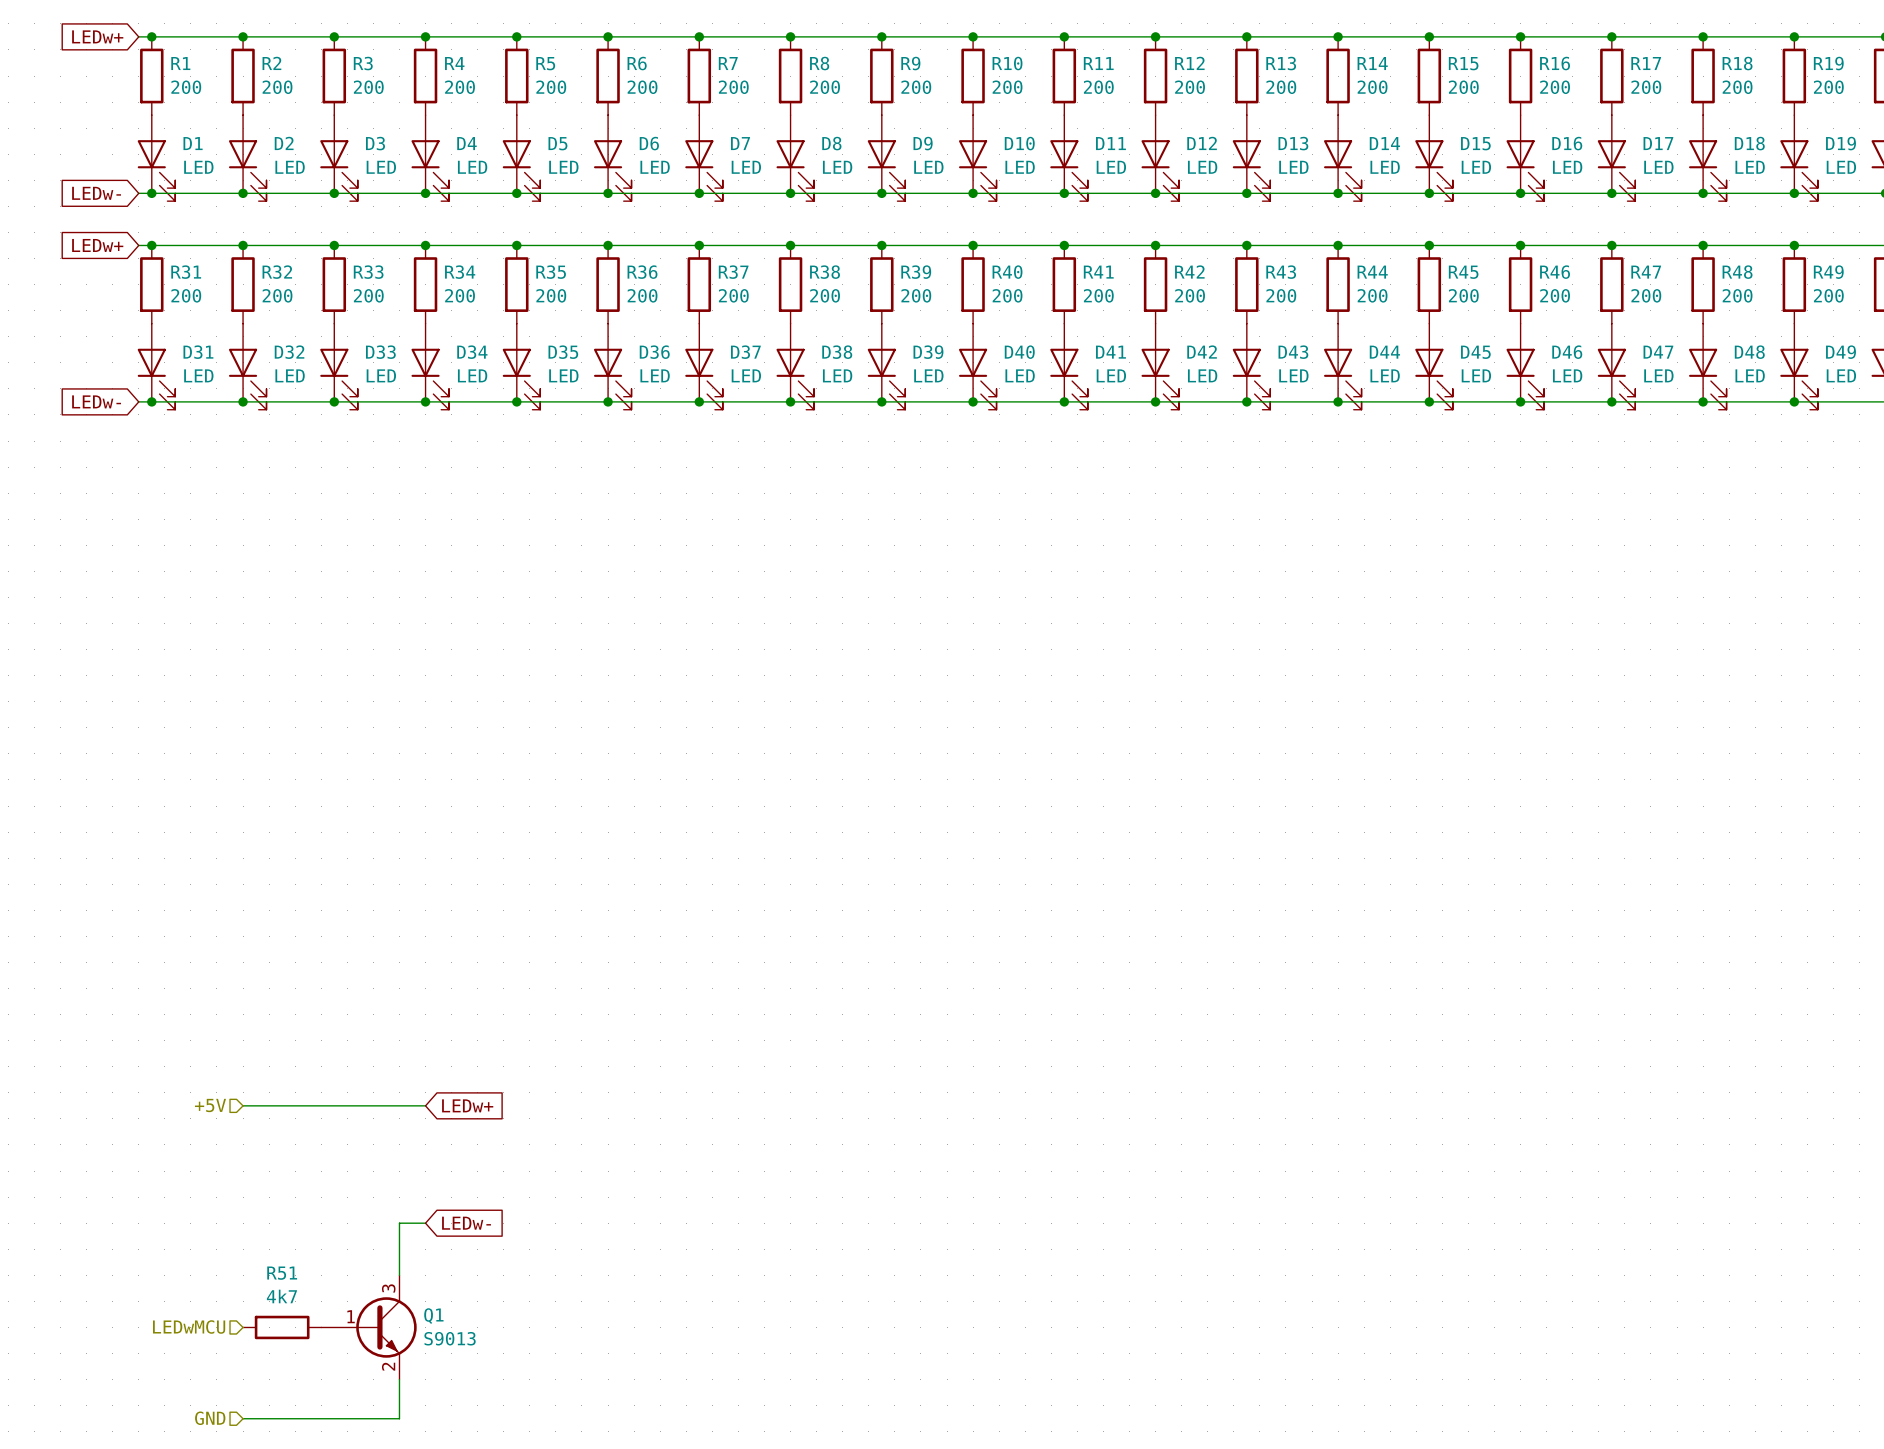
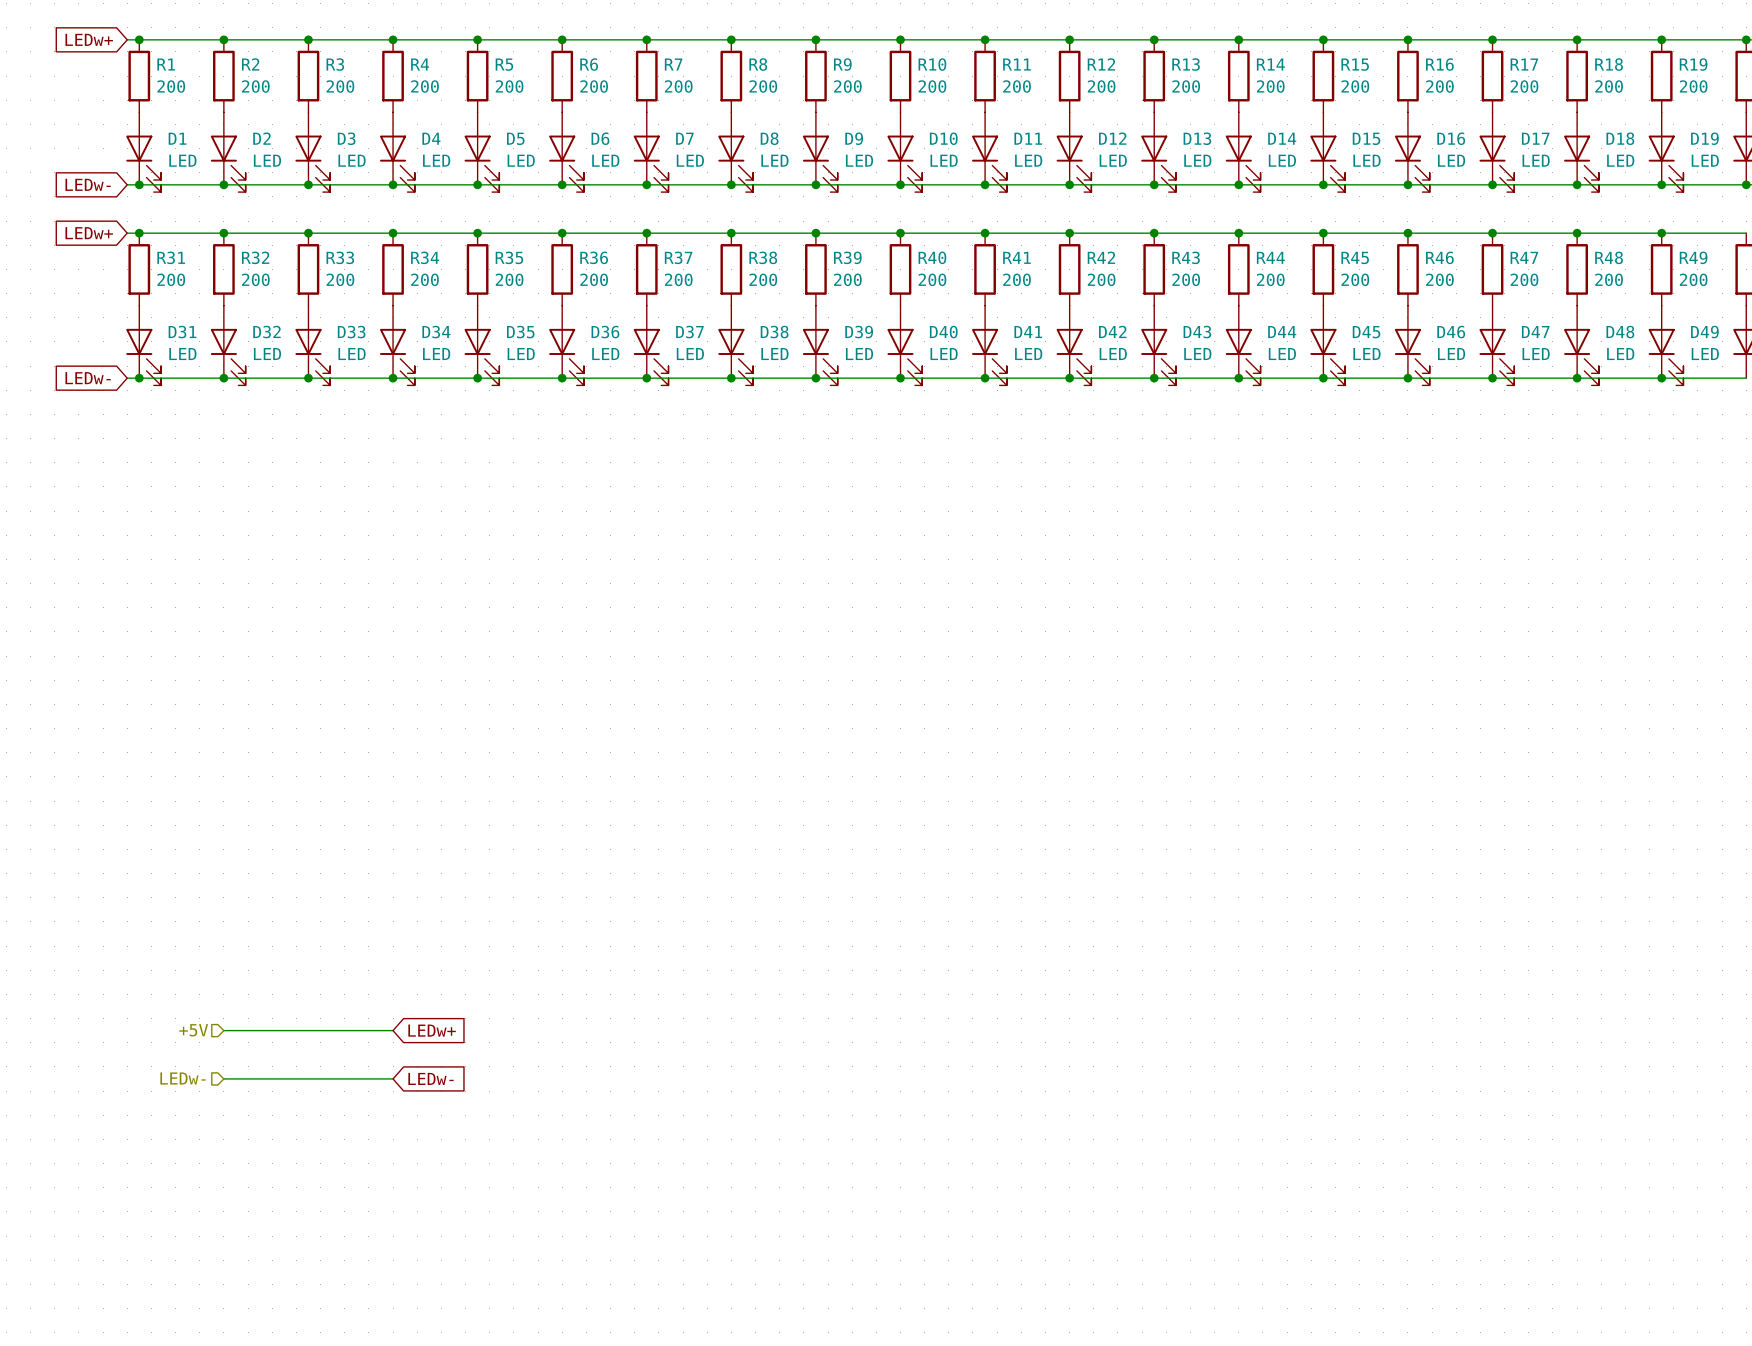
hierarchical label: none -> LEDw- (183, 1078)
wire: none -> (223, 1078) (393, 1078)
wire: (425, 1223) (399, 1223) (399, 1275) -> none
global label position: LEDw- (466, 1223) -> LEDw- (431, 1078)
hierarchical label: LEDwMCU (189, 1327) -> none
R51: 4k7 (282, 1327) -> none
Q1: S9013 (368, 1327) -> none
wire: (399, 1379) (399, 1418) (243, 1418) -> none
hierarchical label: GND (210, 1418) -> none

